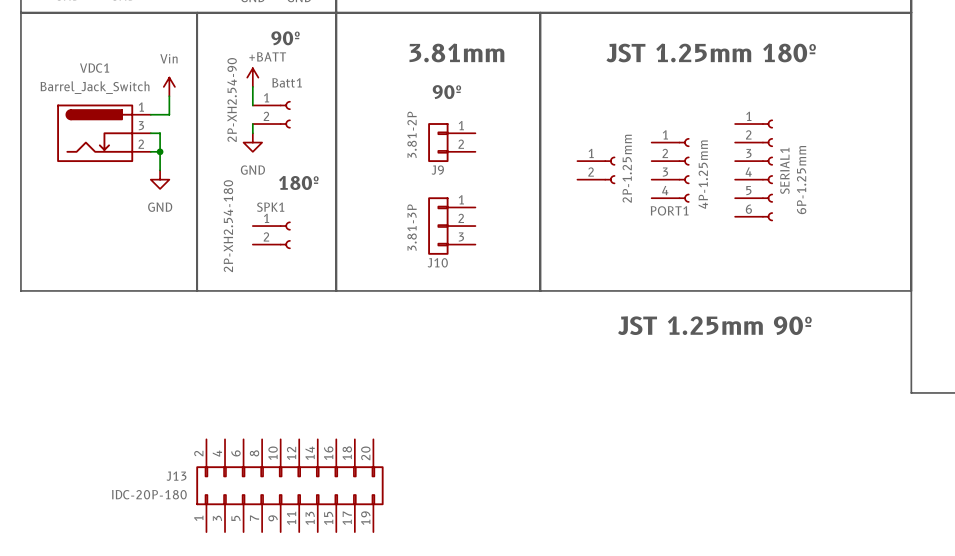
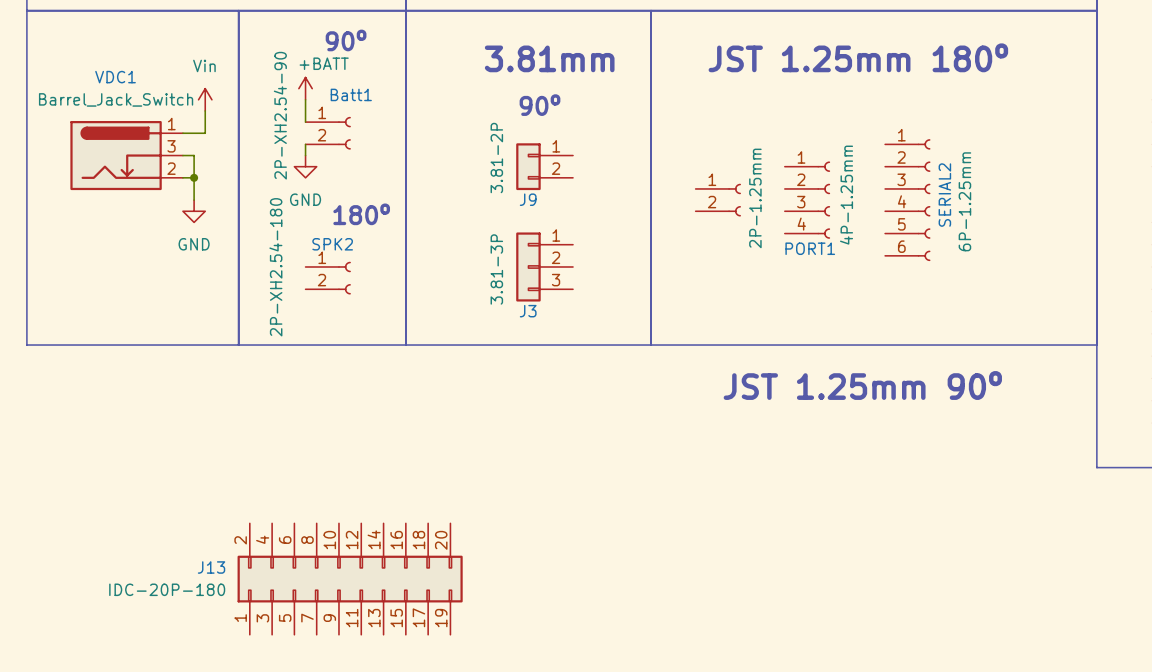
SERIAL1 name: SERIAL1 (784, 170) -> SERIAL2 (944, 195)
SPK1 name: SPK1 (270, 207) -> SPK2 (332, 244)
J10 name: J10 (437, 262) -> J3 (528, 311)

